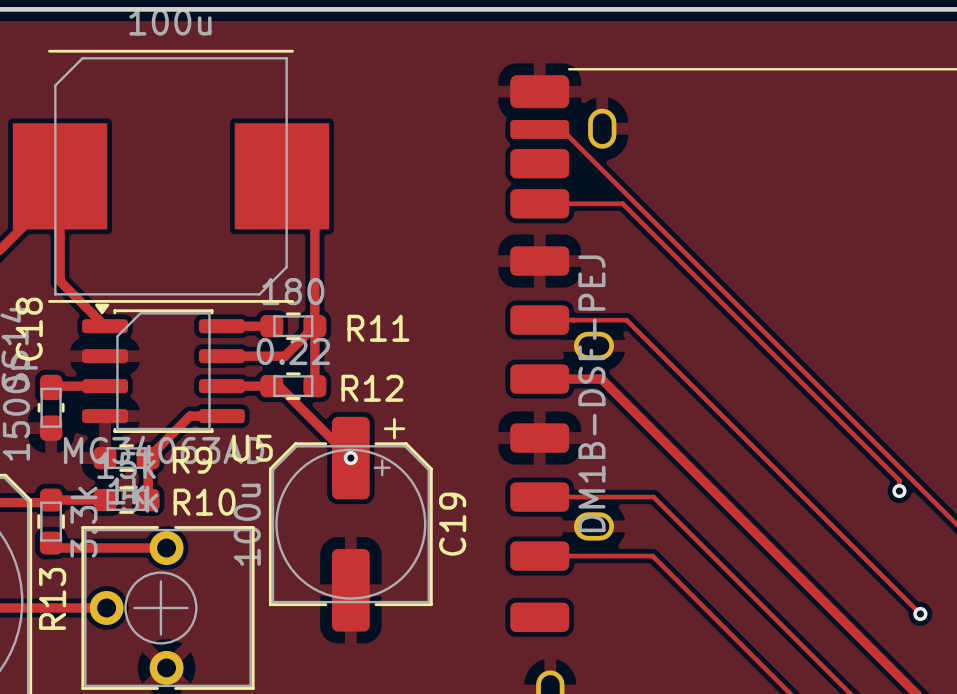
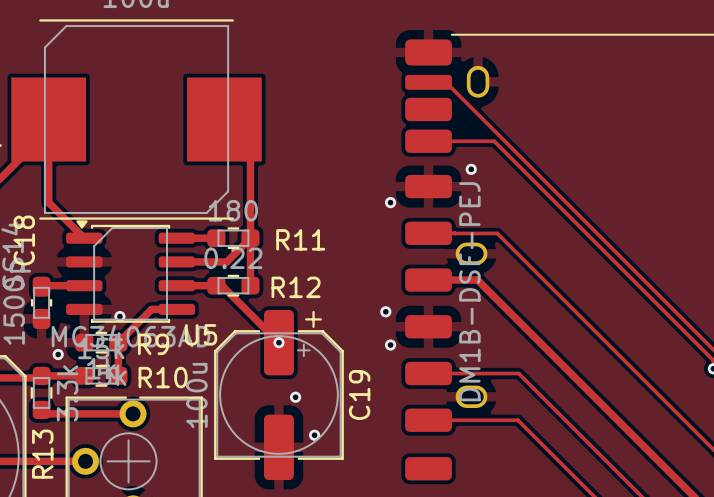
via: none -> (471, 169)
via: none -> (390, 202)
via: none -> (385, 311)
via: none -> (119, 316)
via: none -> (390, 345)
via: none -> (58, 354)
via: none -> (295, 397)
via: none -> (314, 435)

